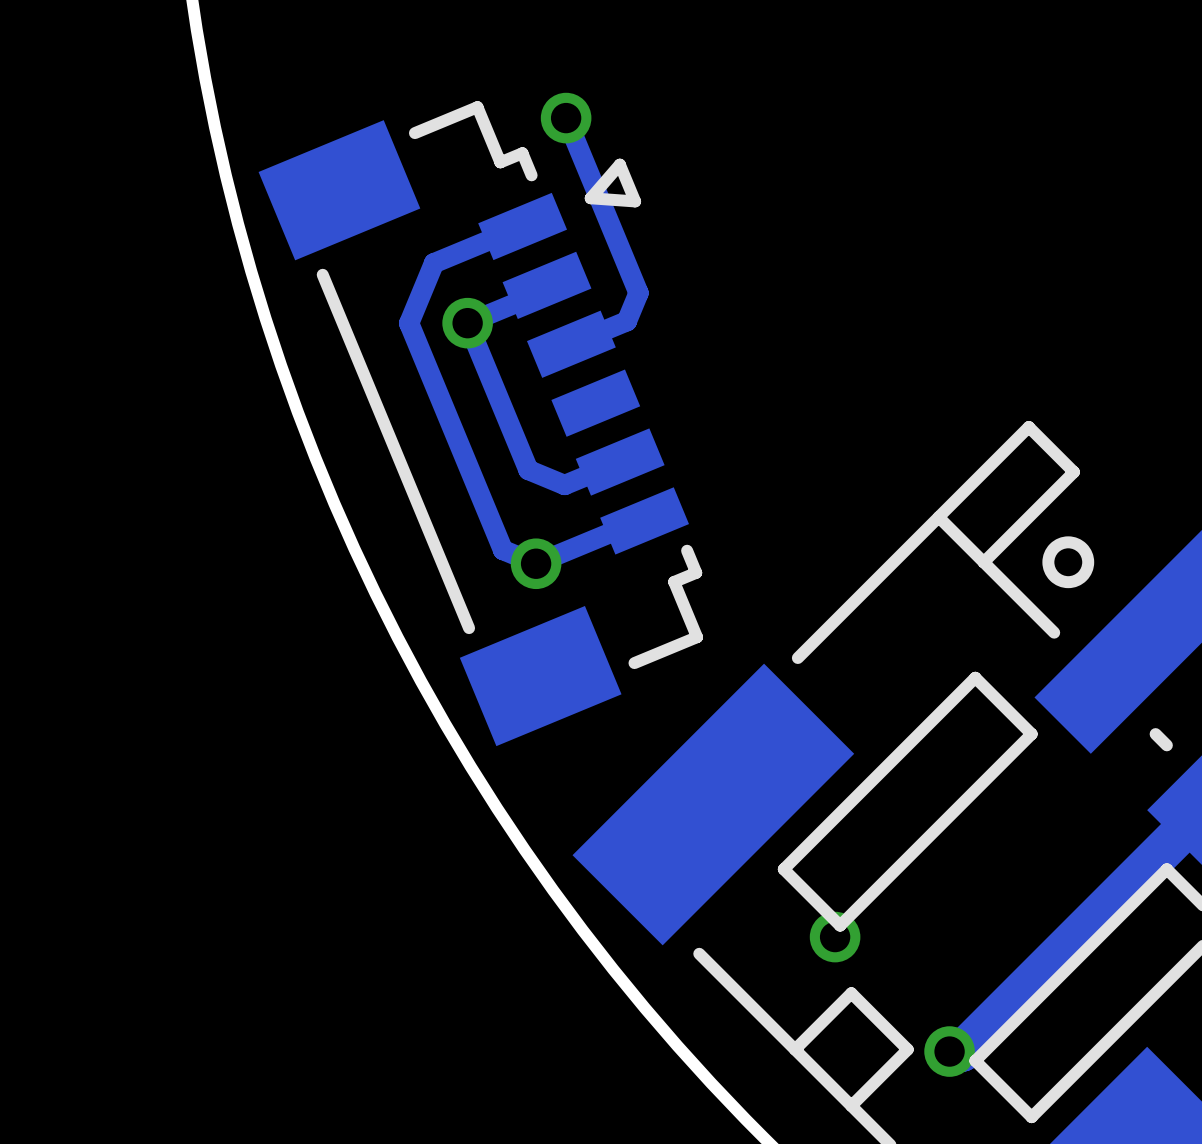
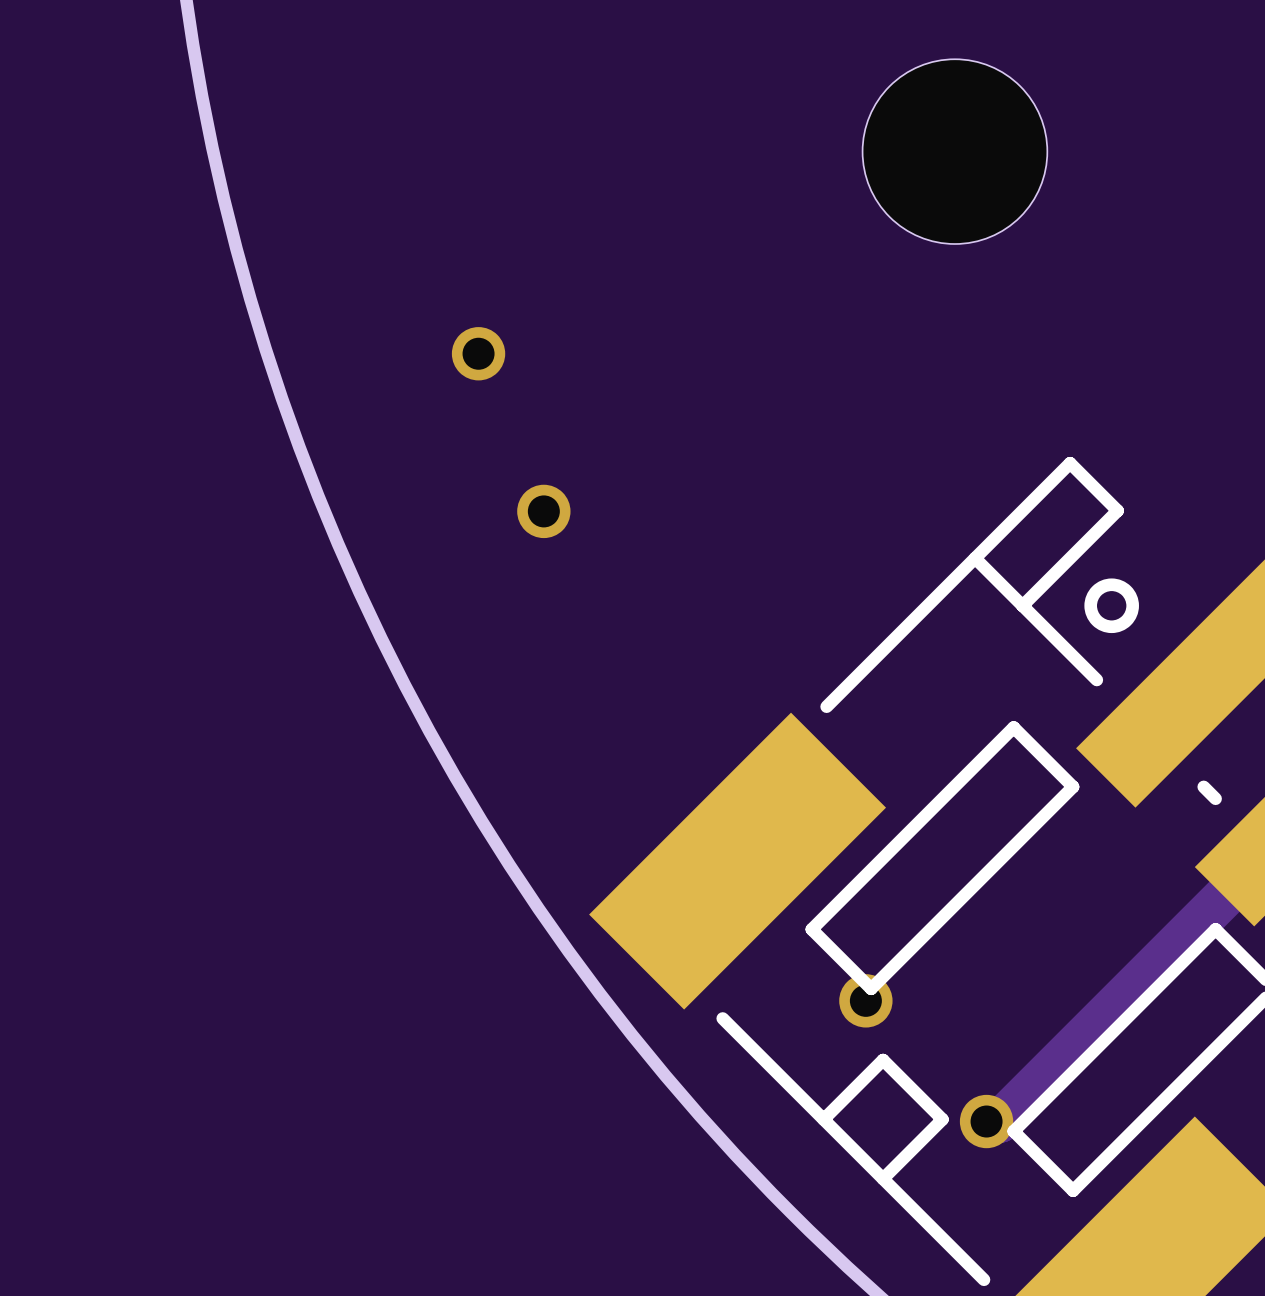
track: (566, 118) (638, 293) (626, 321) (571, 344) -> none
via: (566, 118) -> none
part: none -> (954, 151)
track: (522, 226) (434, 263) (409, 323) (503, 550) (536, 563) (642, 519) -> none
track: (547, 285) (544, 291) (467, 323) (528, 470) (564, 485) (620, 462) -> none
part: (480, 423) -> none
via position: (536, 563) -> (543, 511)

